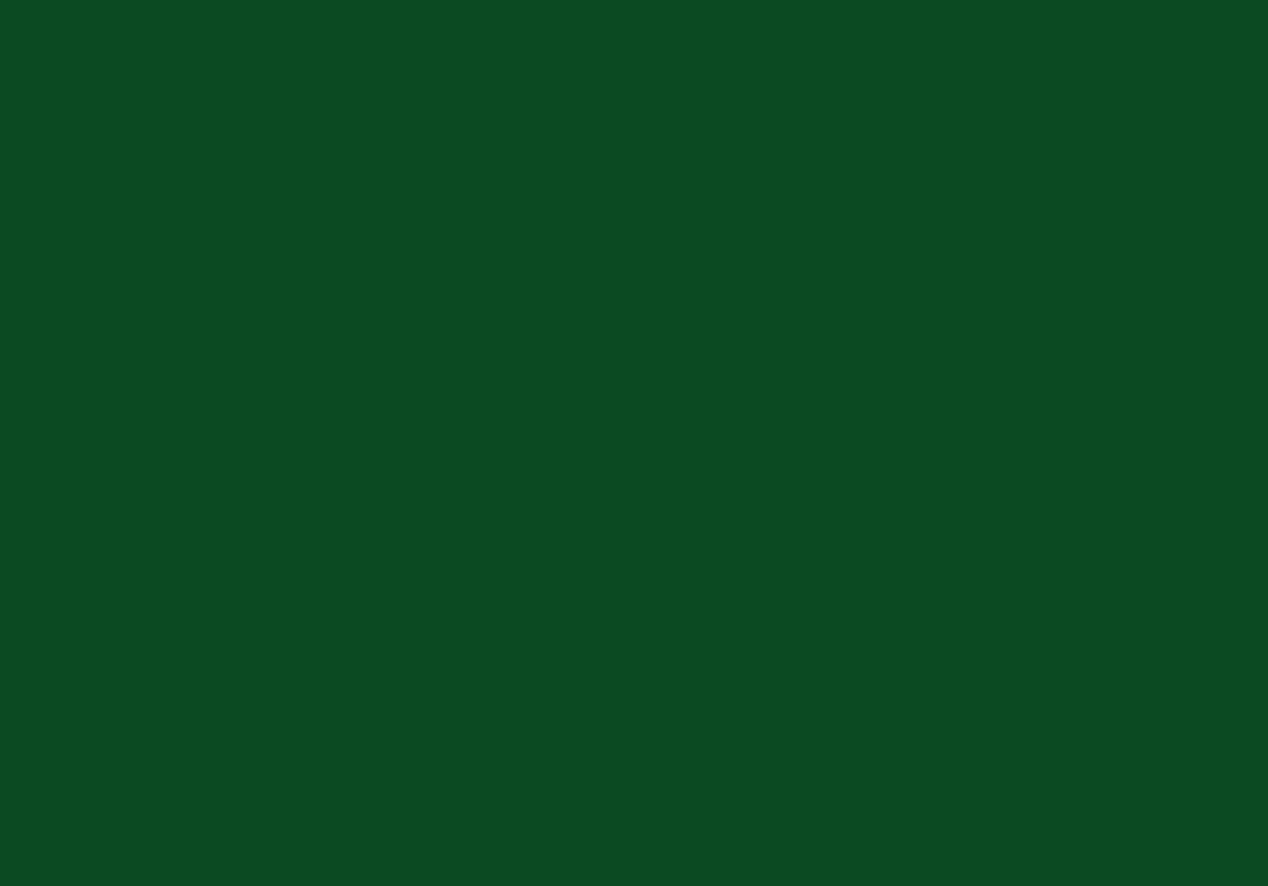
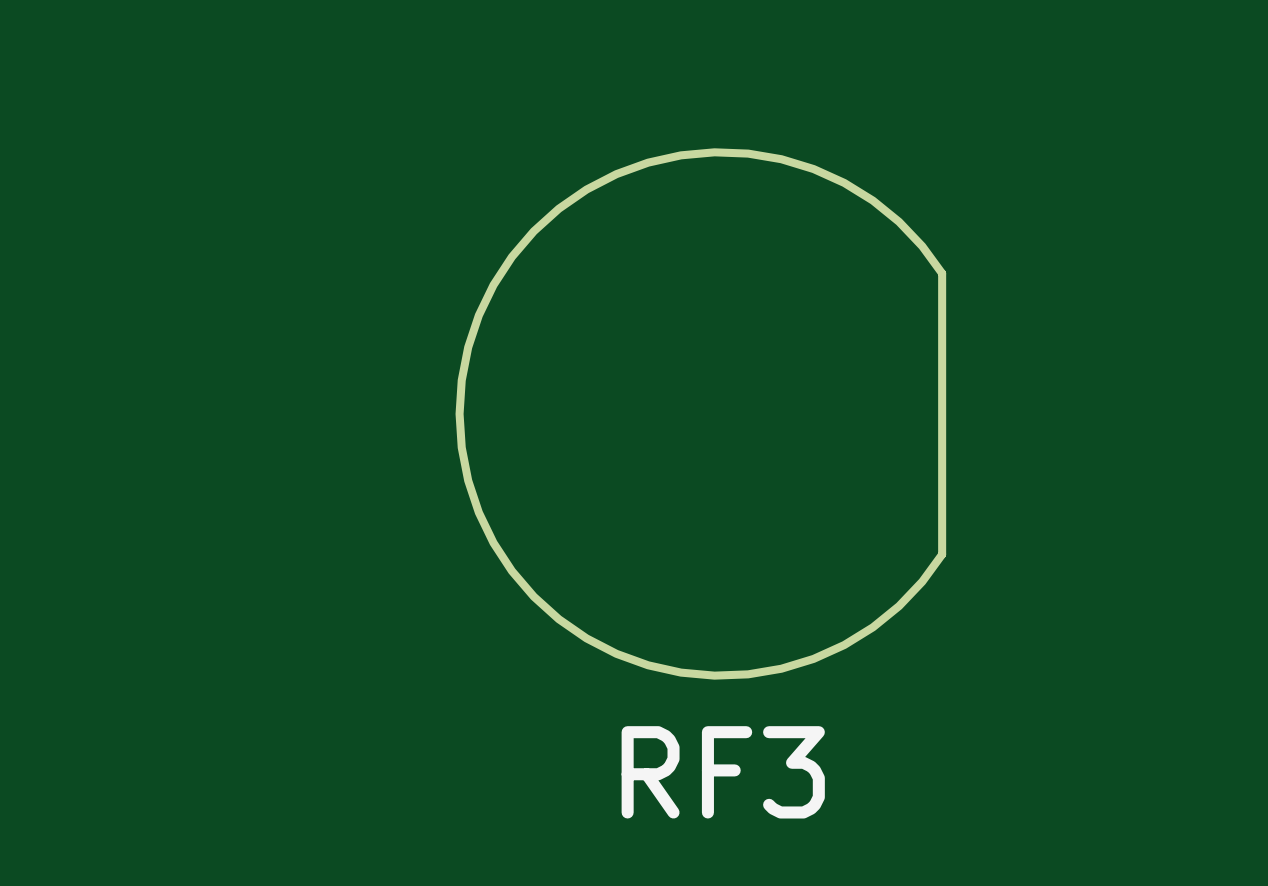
RF3: none -> (700, 413)

